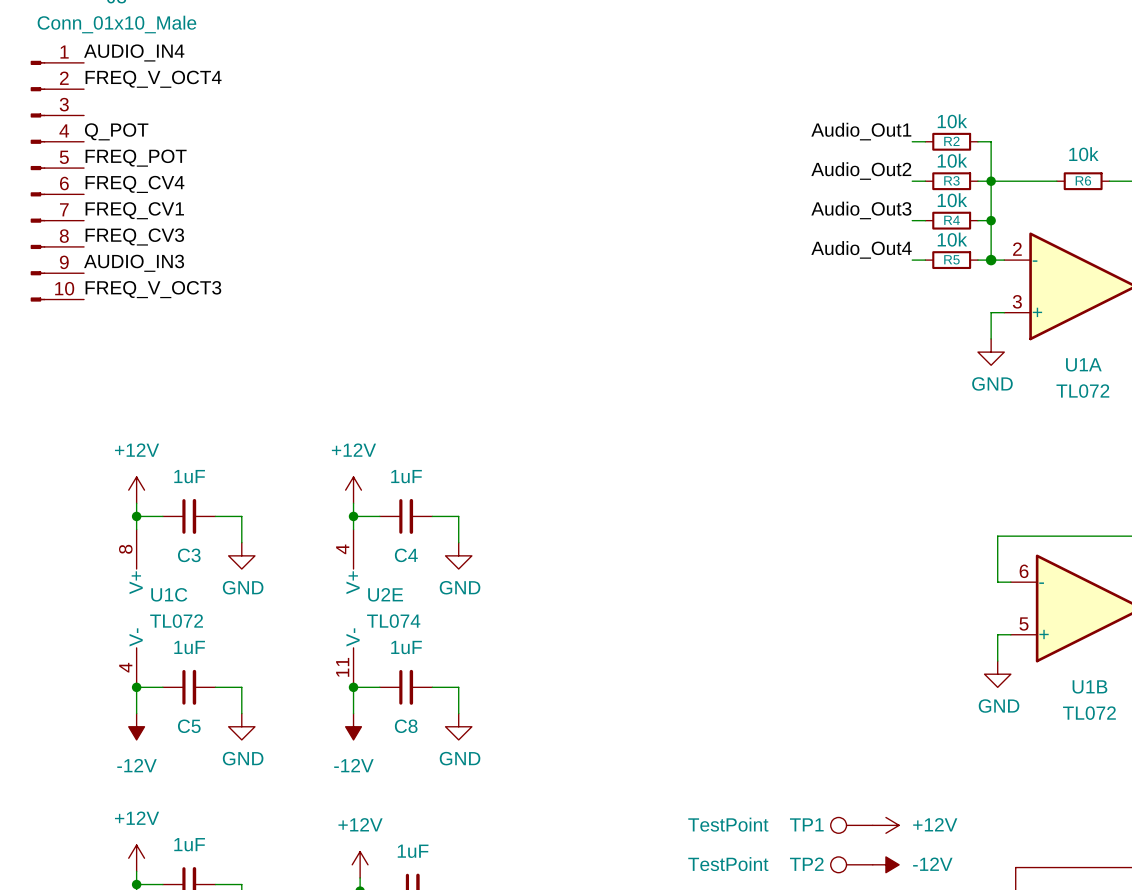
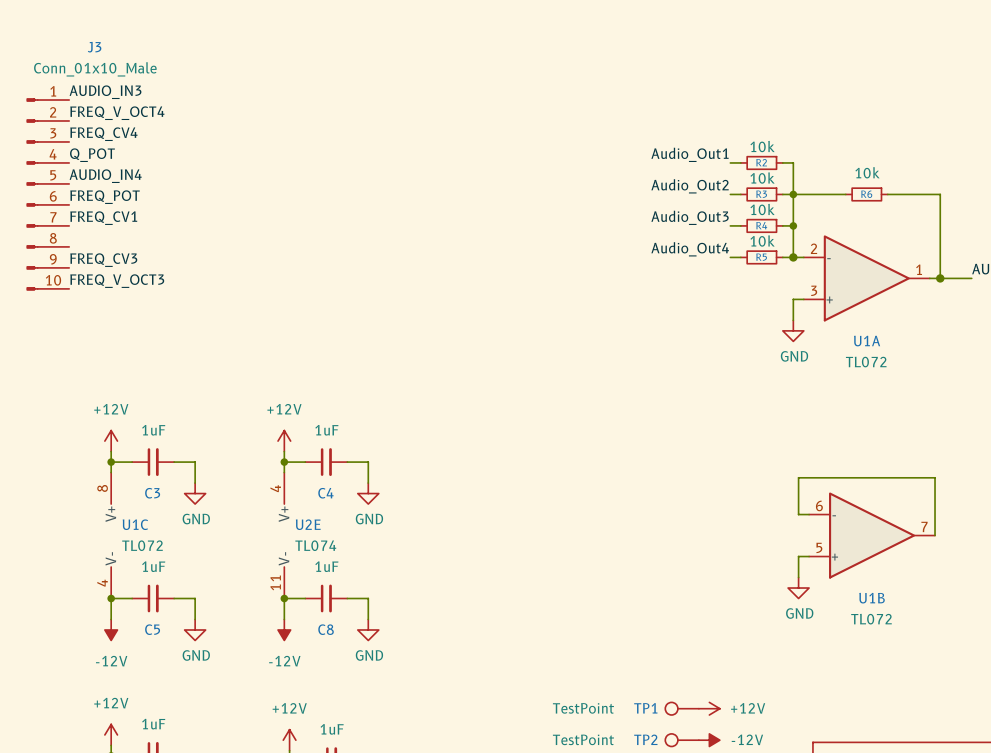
label: AUDIO_IN4 (134, 52) -> AUDIO_IN3 (105, 92)
label: none -> FREQ_CV4 (103, 134)
label: FREQ_POT (136, 158) -> AUDIO_IN4 (105, 176)
label: FREQ_CV4 (134, 184) -> FREQ_POT (105, 197)
label: FREQ_CV3 (134, 237) -> none
label: AUDIO_IN3 (134, 263) -> FREQ_CV3 (103, 260)

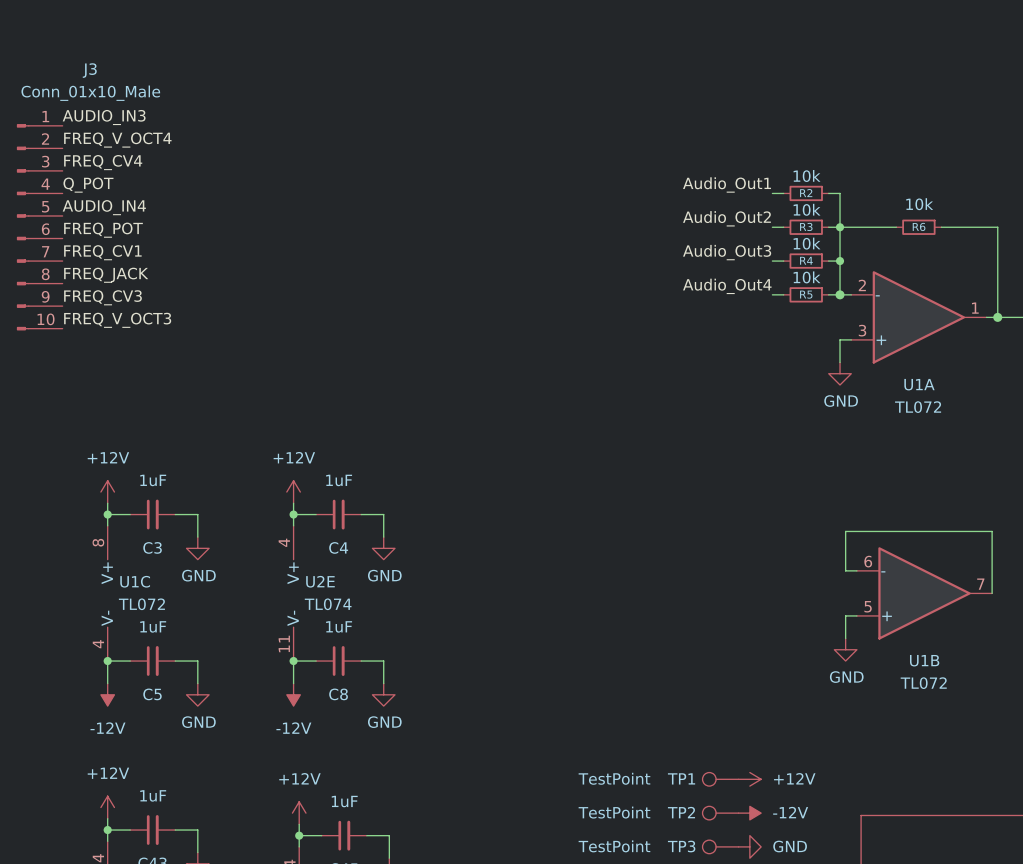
label: none -> FREQ_JACK (106, 275)

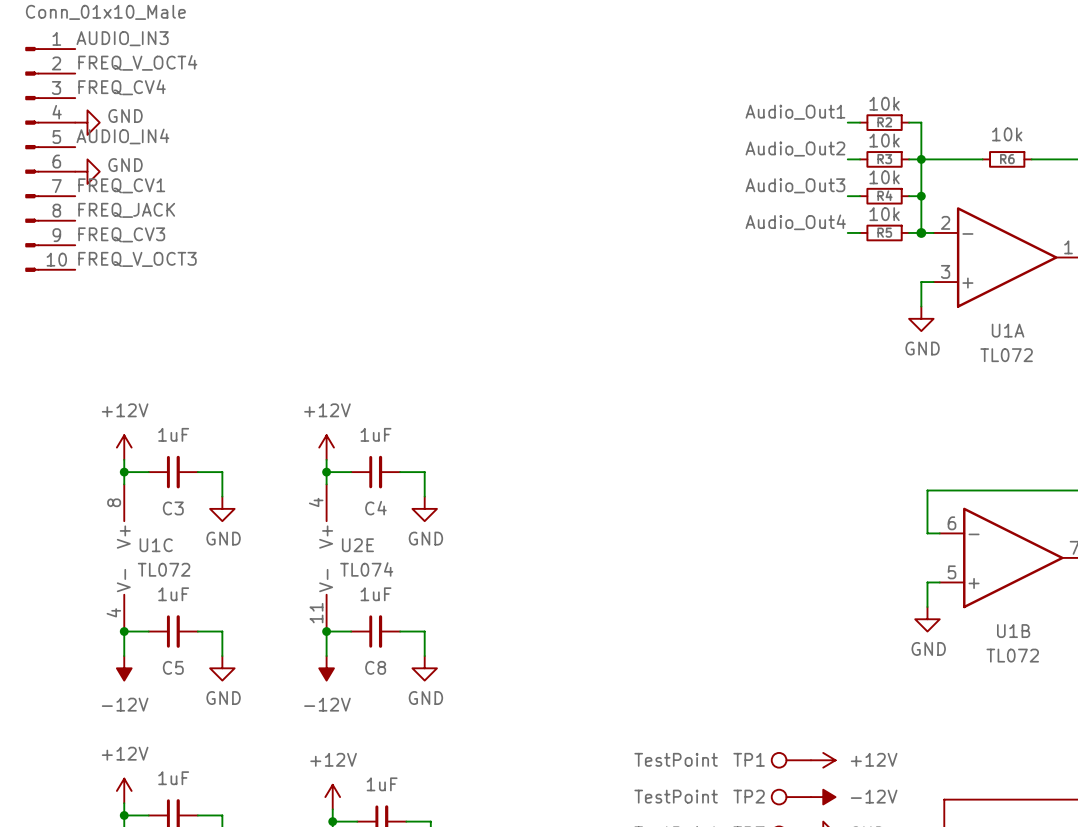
label: Q_POT (88, 185) -> none
power symbol: none -> GND (87, 122)
label: FREQ_POT (103, 230) -> none
power symbol: none -> GND (87, 171)

